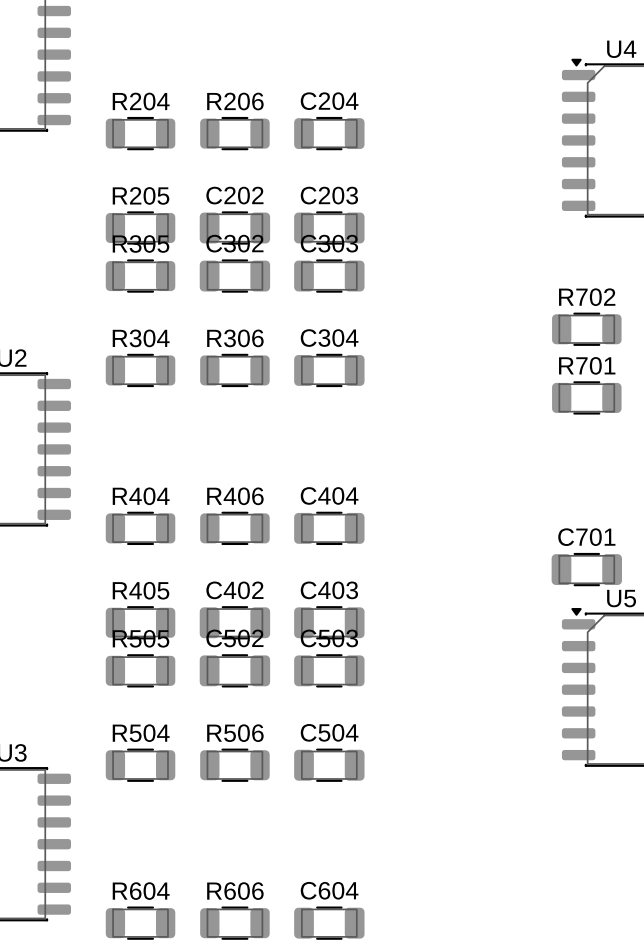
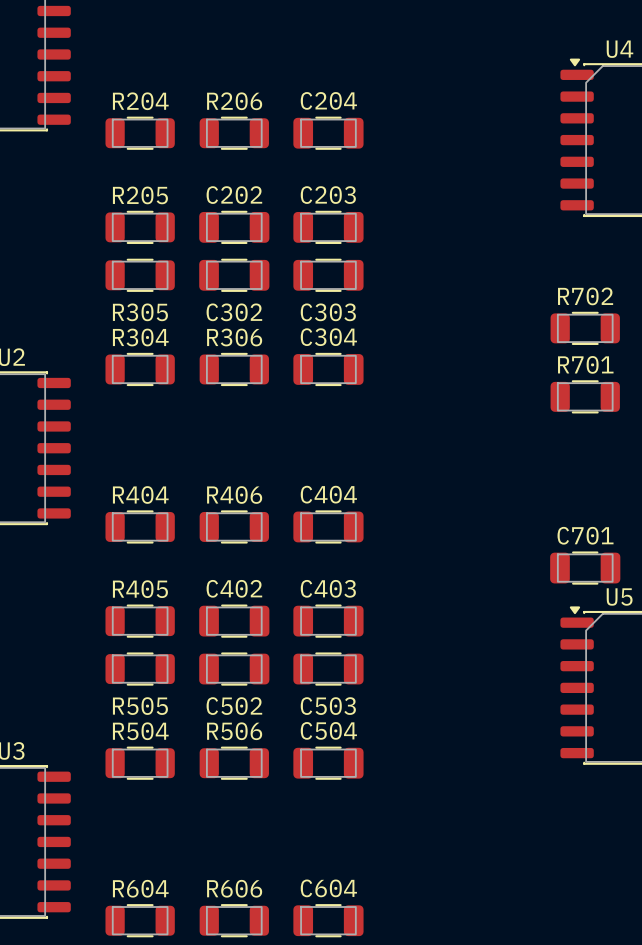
R305 name position: R305 (141, 243) -> R305 (140, 312)
C302 name position: C302 (234, 243) -> C302 (234, 312)
C303 name position: C303 (329, 243) -> C303 (328, 312)
R505 name position: R505 (141, 638) -> R505 (140, 706)
C502 name position: C502 (234, 638) -> C502 (234, 706)
C503 name position: C503 (329, 638) -> C503 (328, 706)

